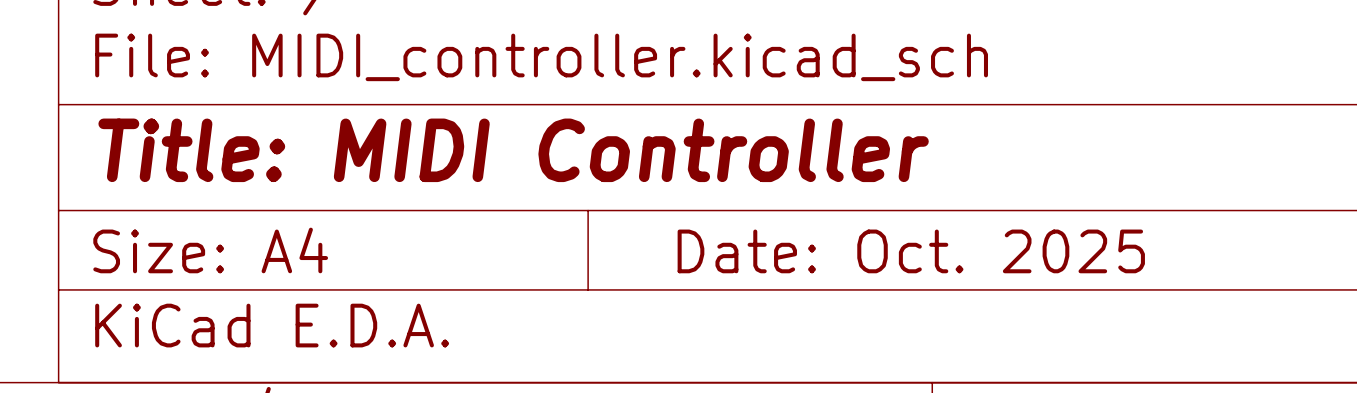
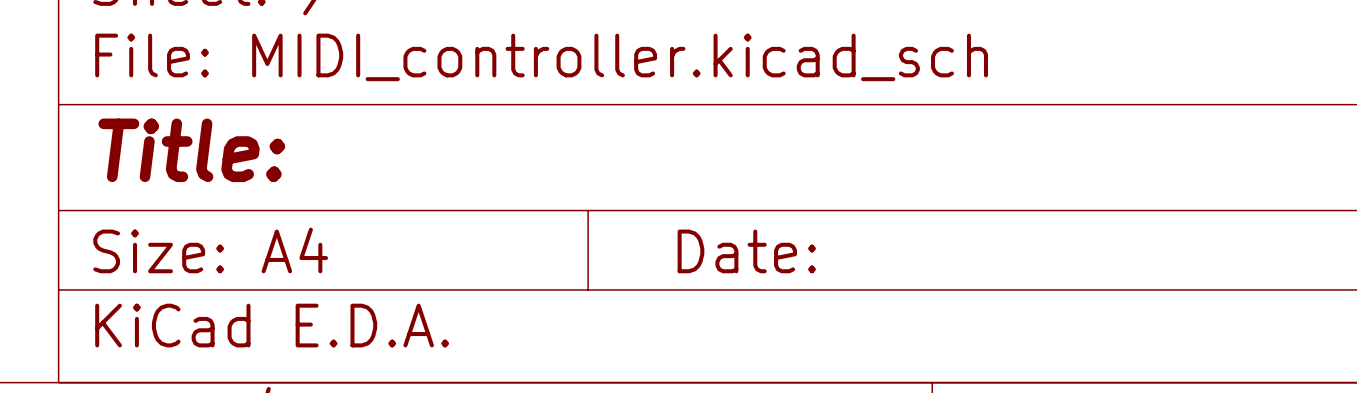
title block: Title: MIDI Controller (513, 150) -> Title: (191, 150)
title block: Date: Oct. 2025 (911, 251) -> Date: (746, 251)

